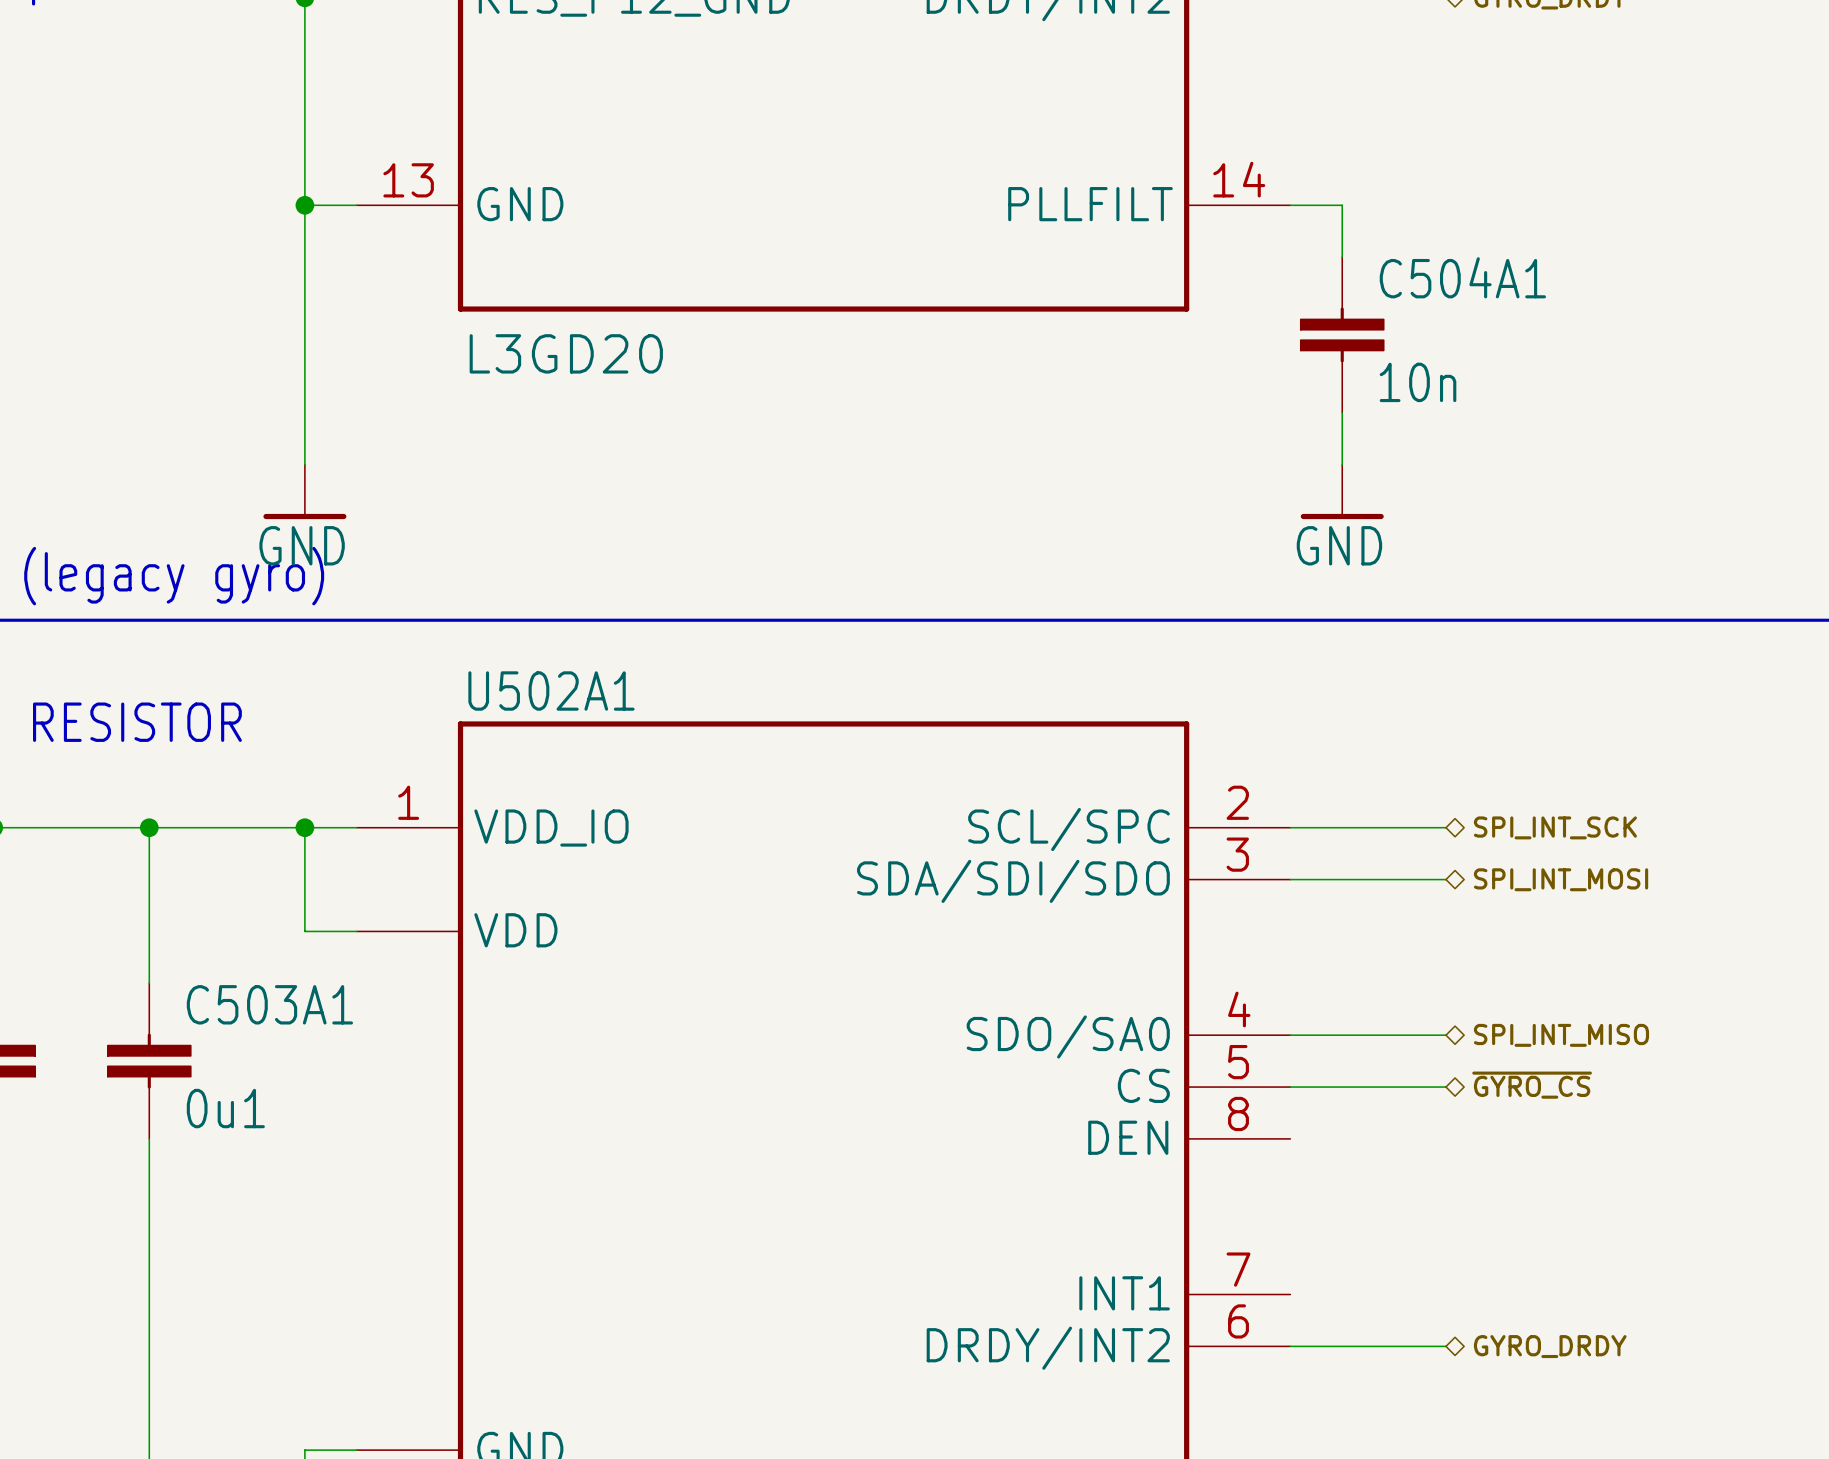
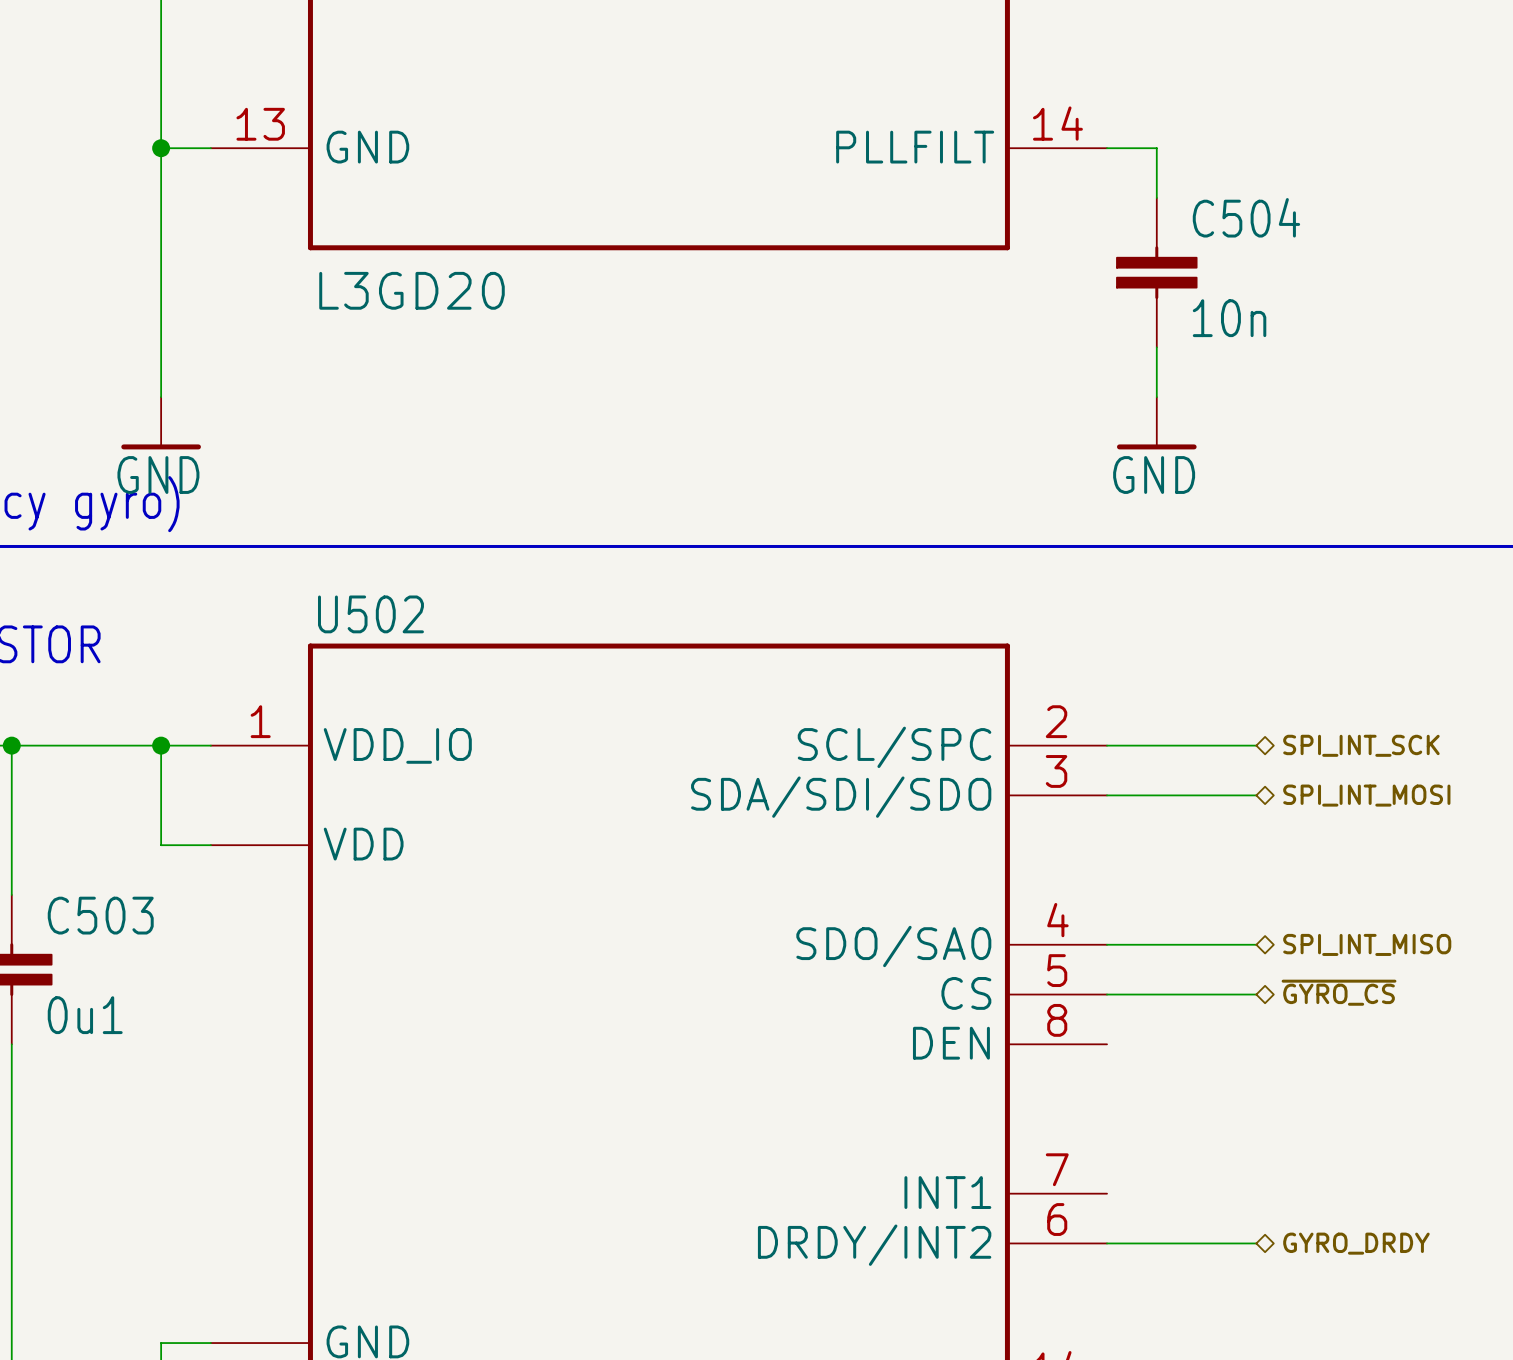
C504A1 name: C504A1 (1462, 277) -> C504 (1246, 217)
U502A1 name: U502A1 (551, 691) -> U502 (370, 614)
C503A1 name: C503A1 (269, 1004) -> C503 (100, 915)

